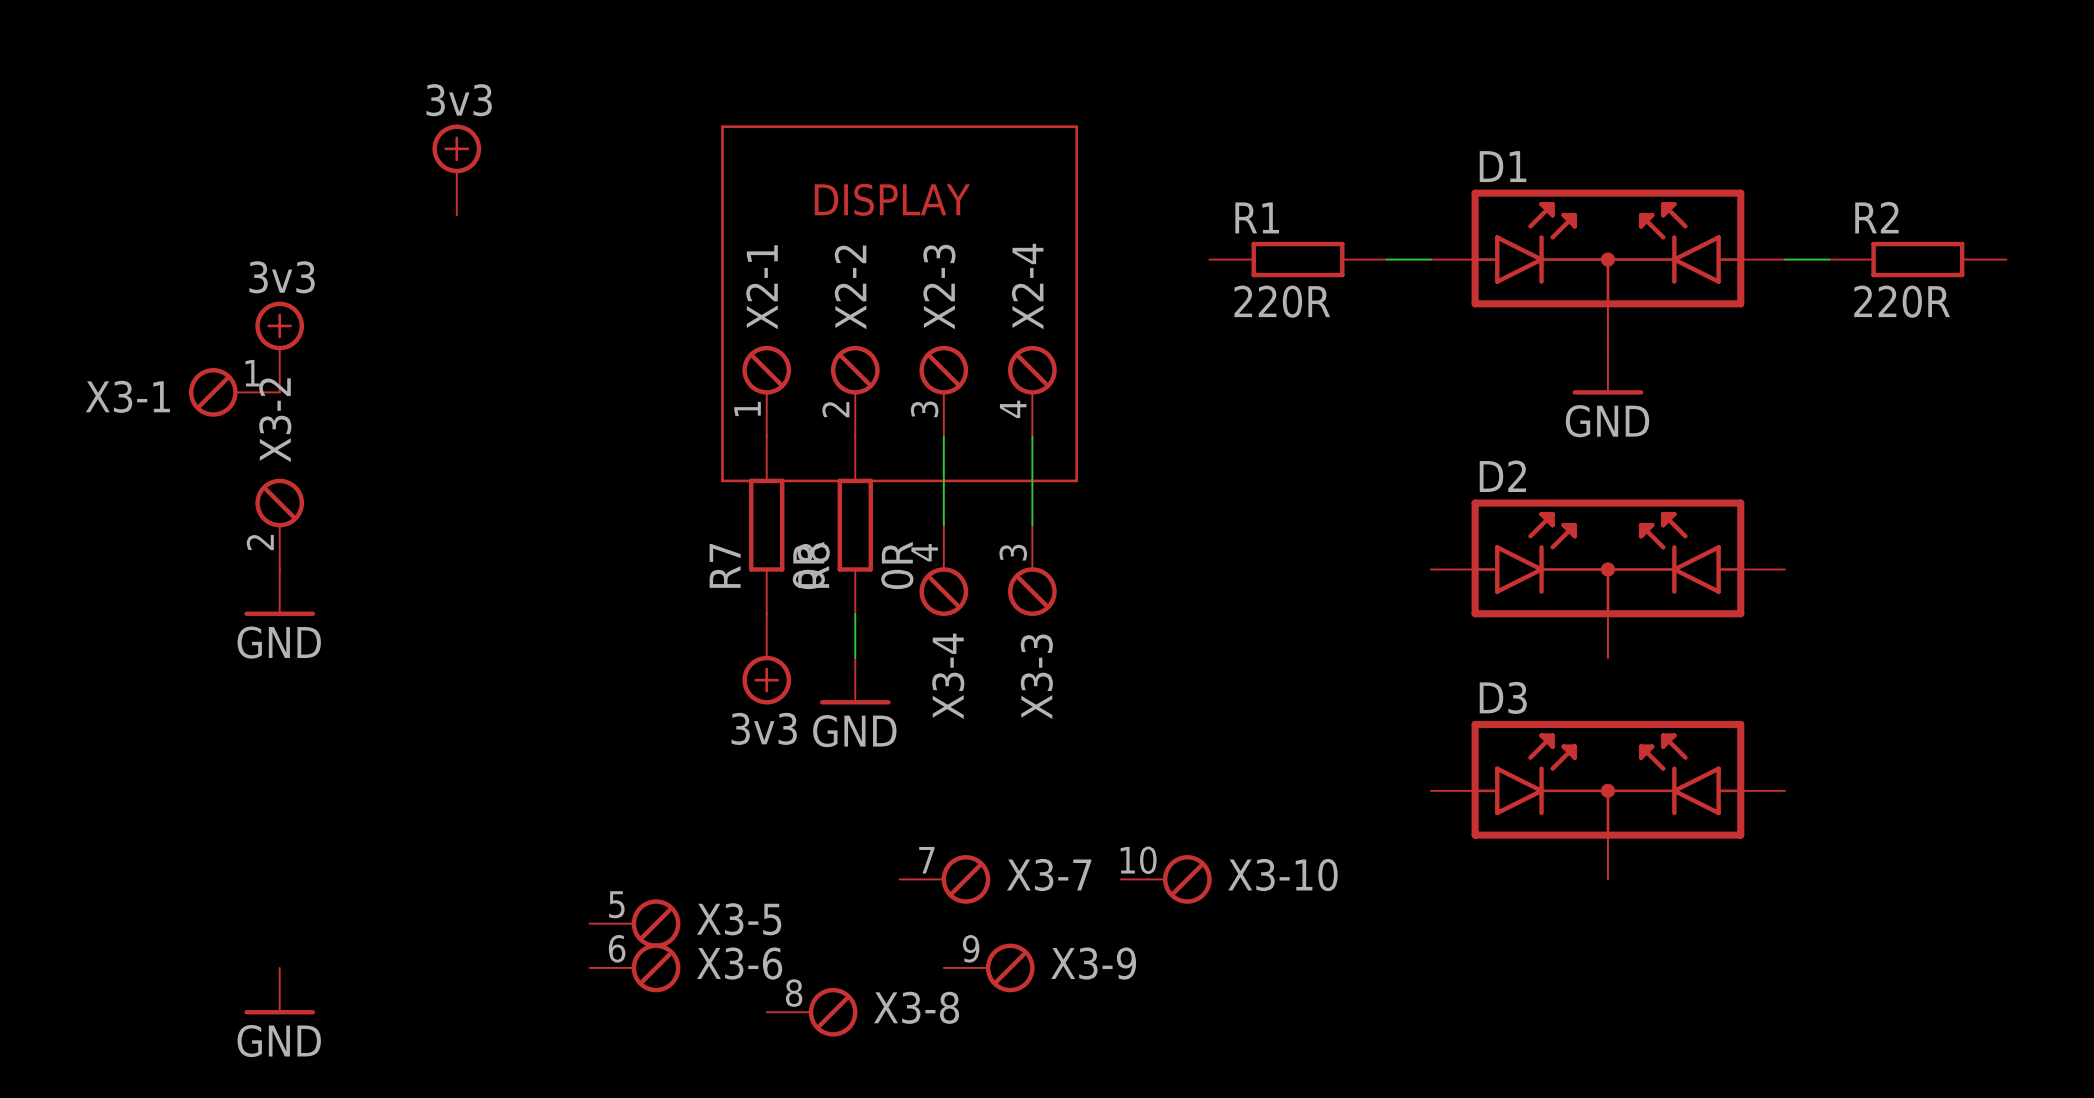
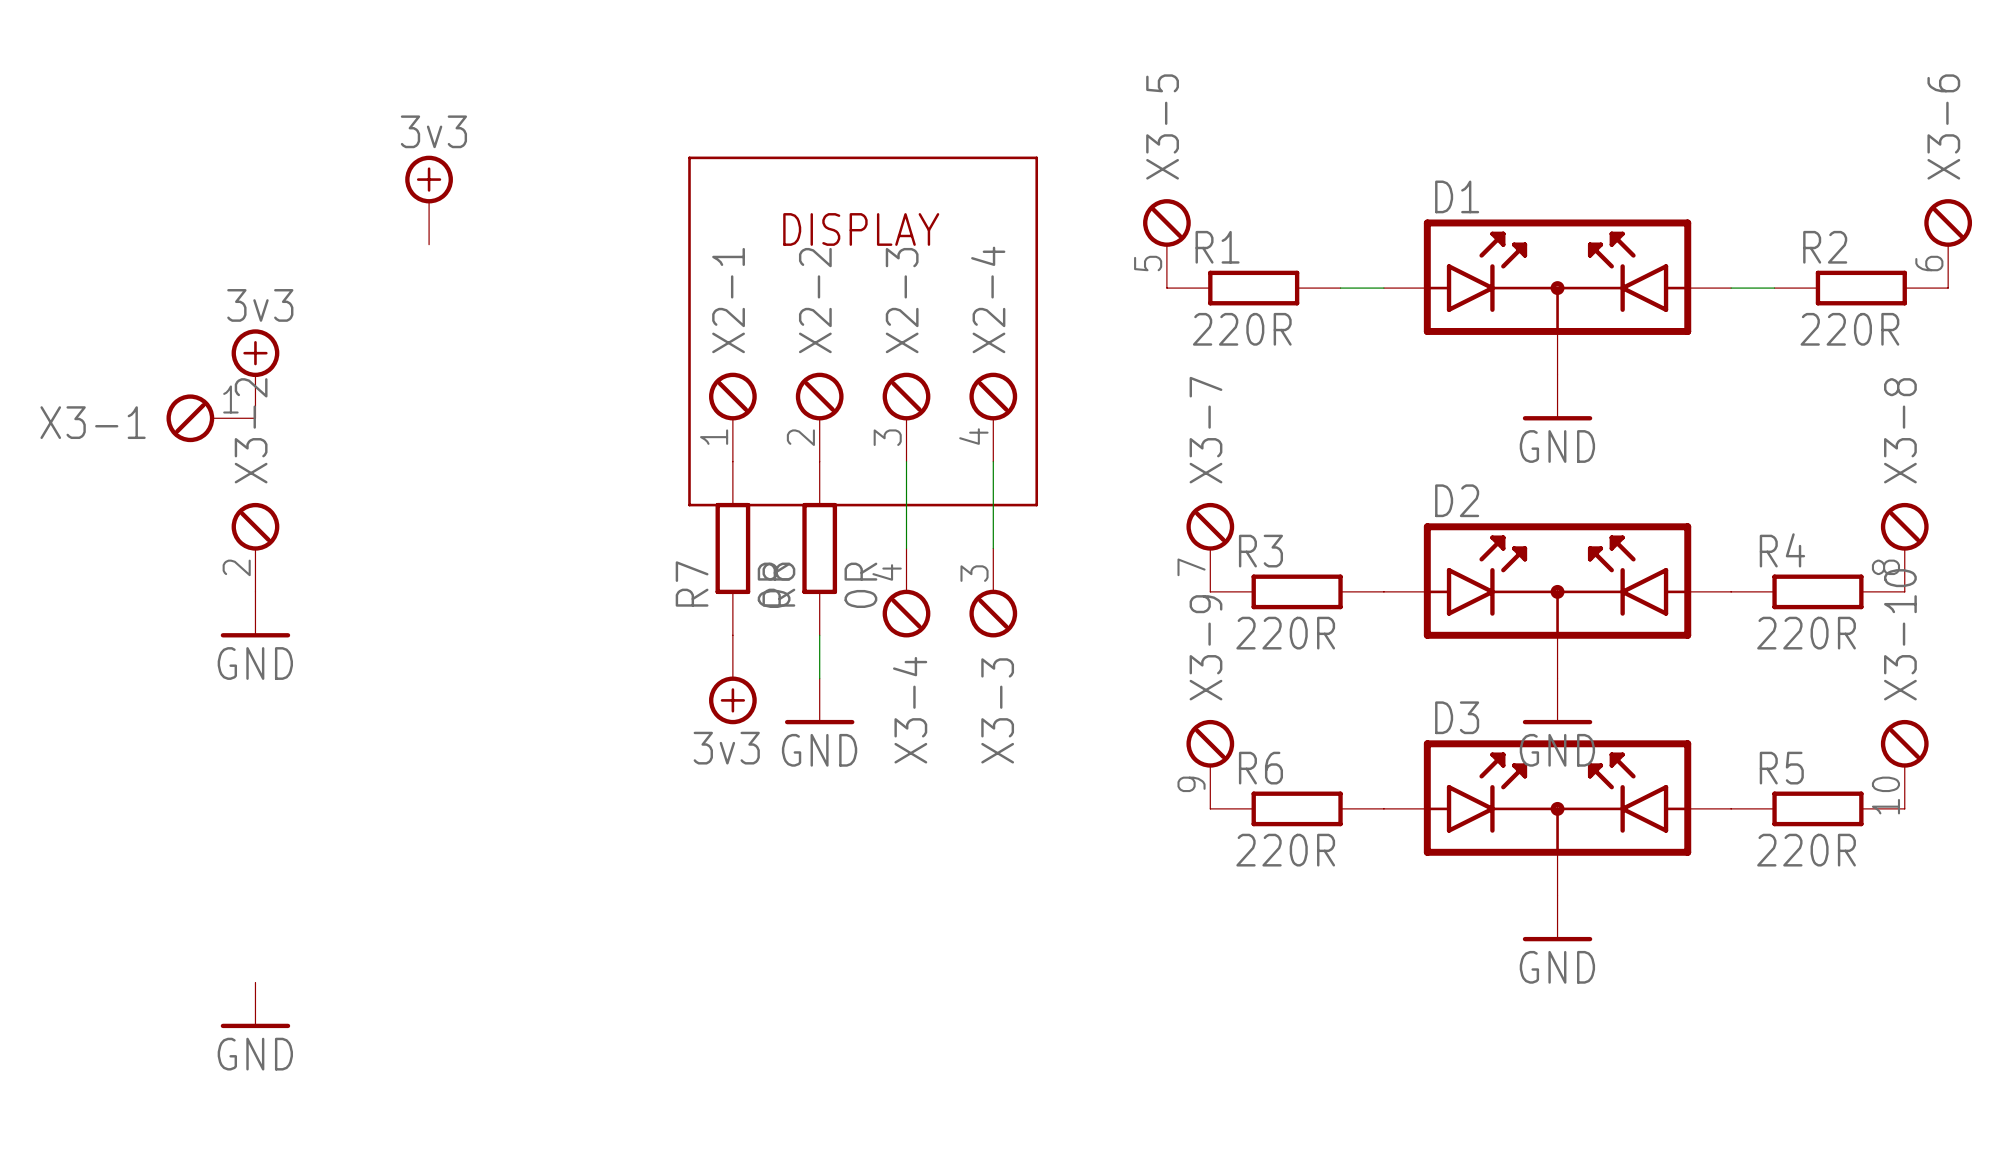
R3: none -> 220R (1297, 591)
R4: none -> 220R (1817, 591)
power symbol: none -> GND (1557, 701)
R6: none -> 220R (1297, 808)
R5: none -> 220R (1817, 808)
X3-7 position: (944, 879) -> (1210, 547)
X3-7 rotation: 0° (965, 879) -> 90° counterclockwise (1210, 526)
X3-10 position: (1166, 879) -> (1904, 764)
X3-10 rotation: 0° (1187, 879) -> 90° counterclockwise (1904, 743)
power symbol: none -> GND (1557, 918)
X3-5 position: (635, 923) -> (1166, 243)
X3-5 rotation: 0° (656, 923) -> 90° counterclockwise (1166, 222)
X3-6 position: (635, 967) -> (1948, 243)
X3-6 rotation: 0° (656, 967) -> 90° counterclockwise (1948, 222)
X3-9 position: (989, 967) -> (1210, 764)
X3-9 rotation: 0° (1010, 967) -> 90° counterclockwise (1210, 743)
X3-8 position: (812, 1012) -> (1904, 547)
X3-8 rotation: 0° (833, 1012) -> 90° counterclockwise (1904, 526)

